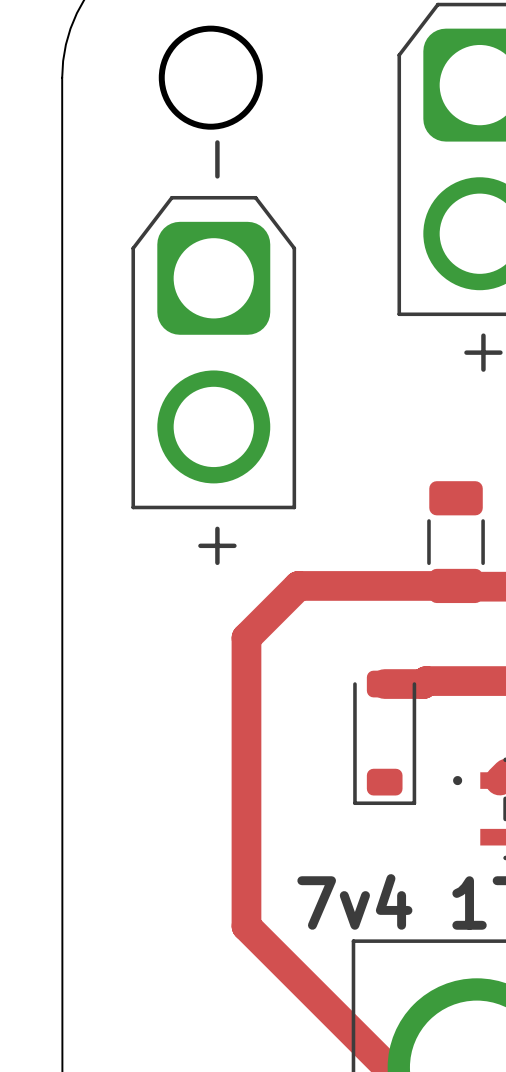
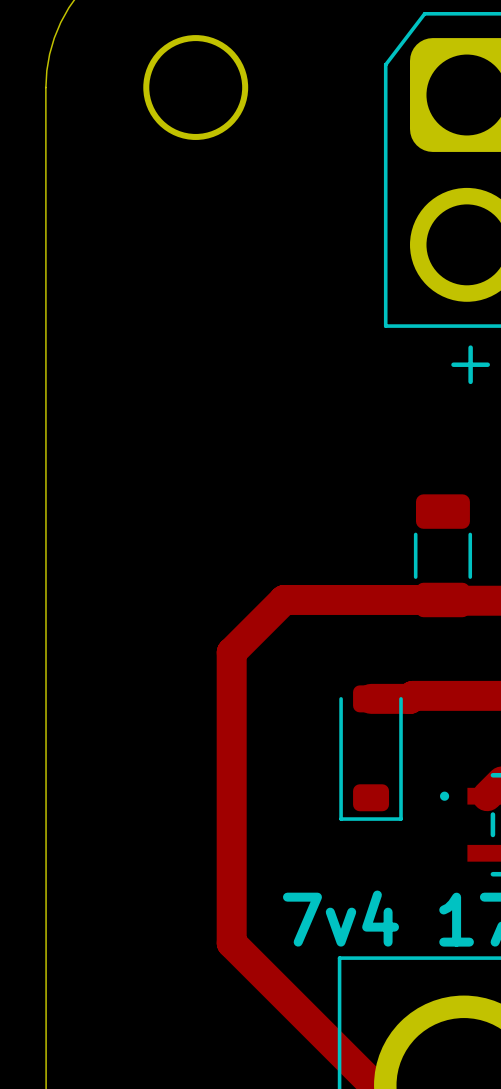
part: (213, 352) -> none

